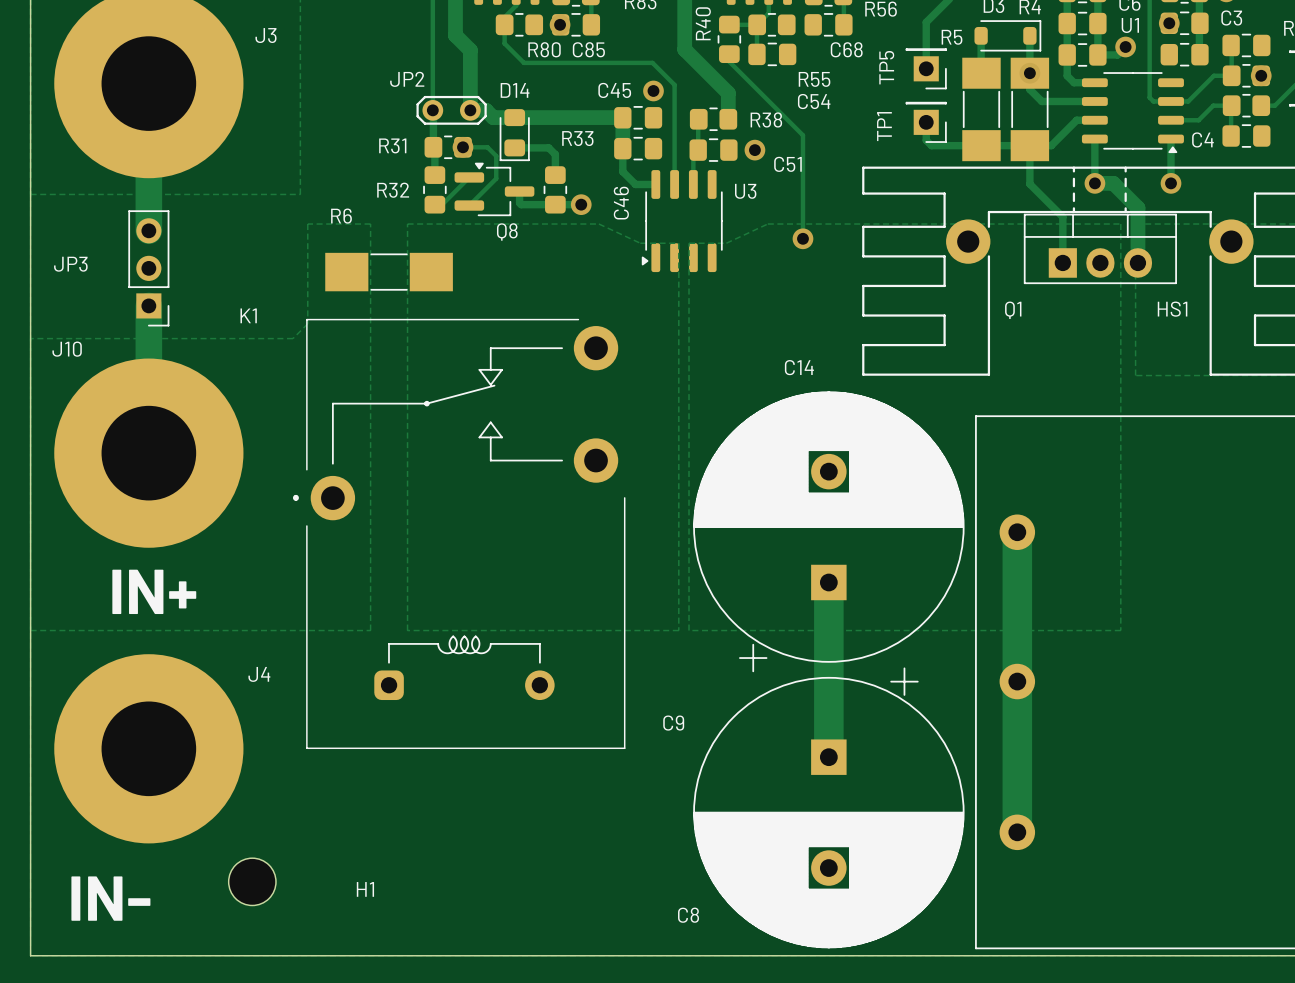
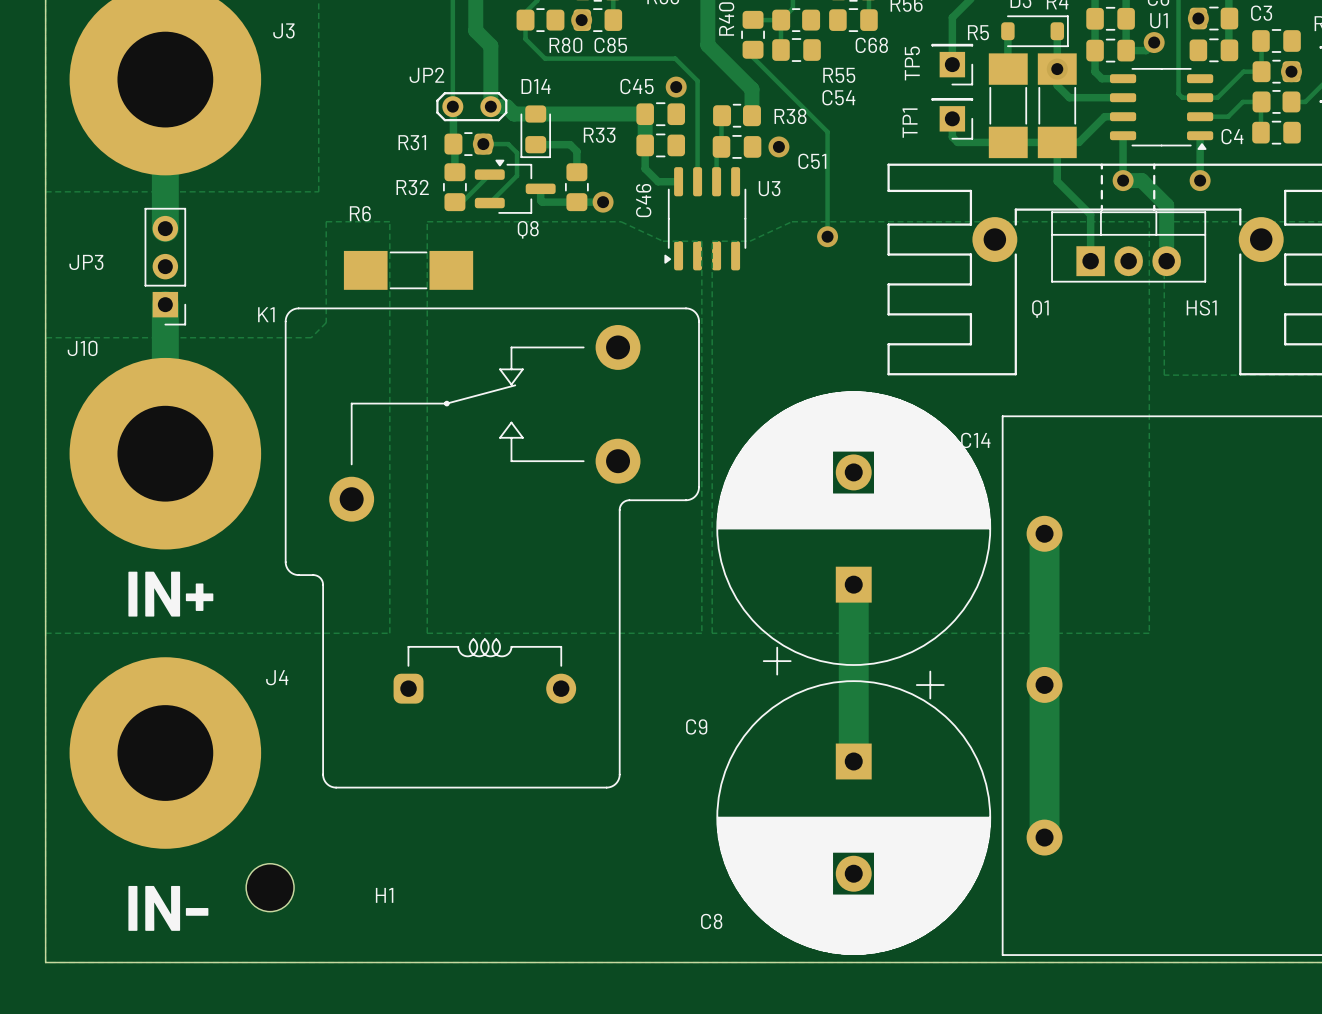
K1 footprint: [292, 318, 626, 750] -> [284, 307, 700, 789]
C14 name position: C14 (799, 367) -> C14 (975, 440)
text position: IN- (110, 898) -> IN- (168, 908)

